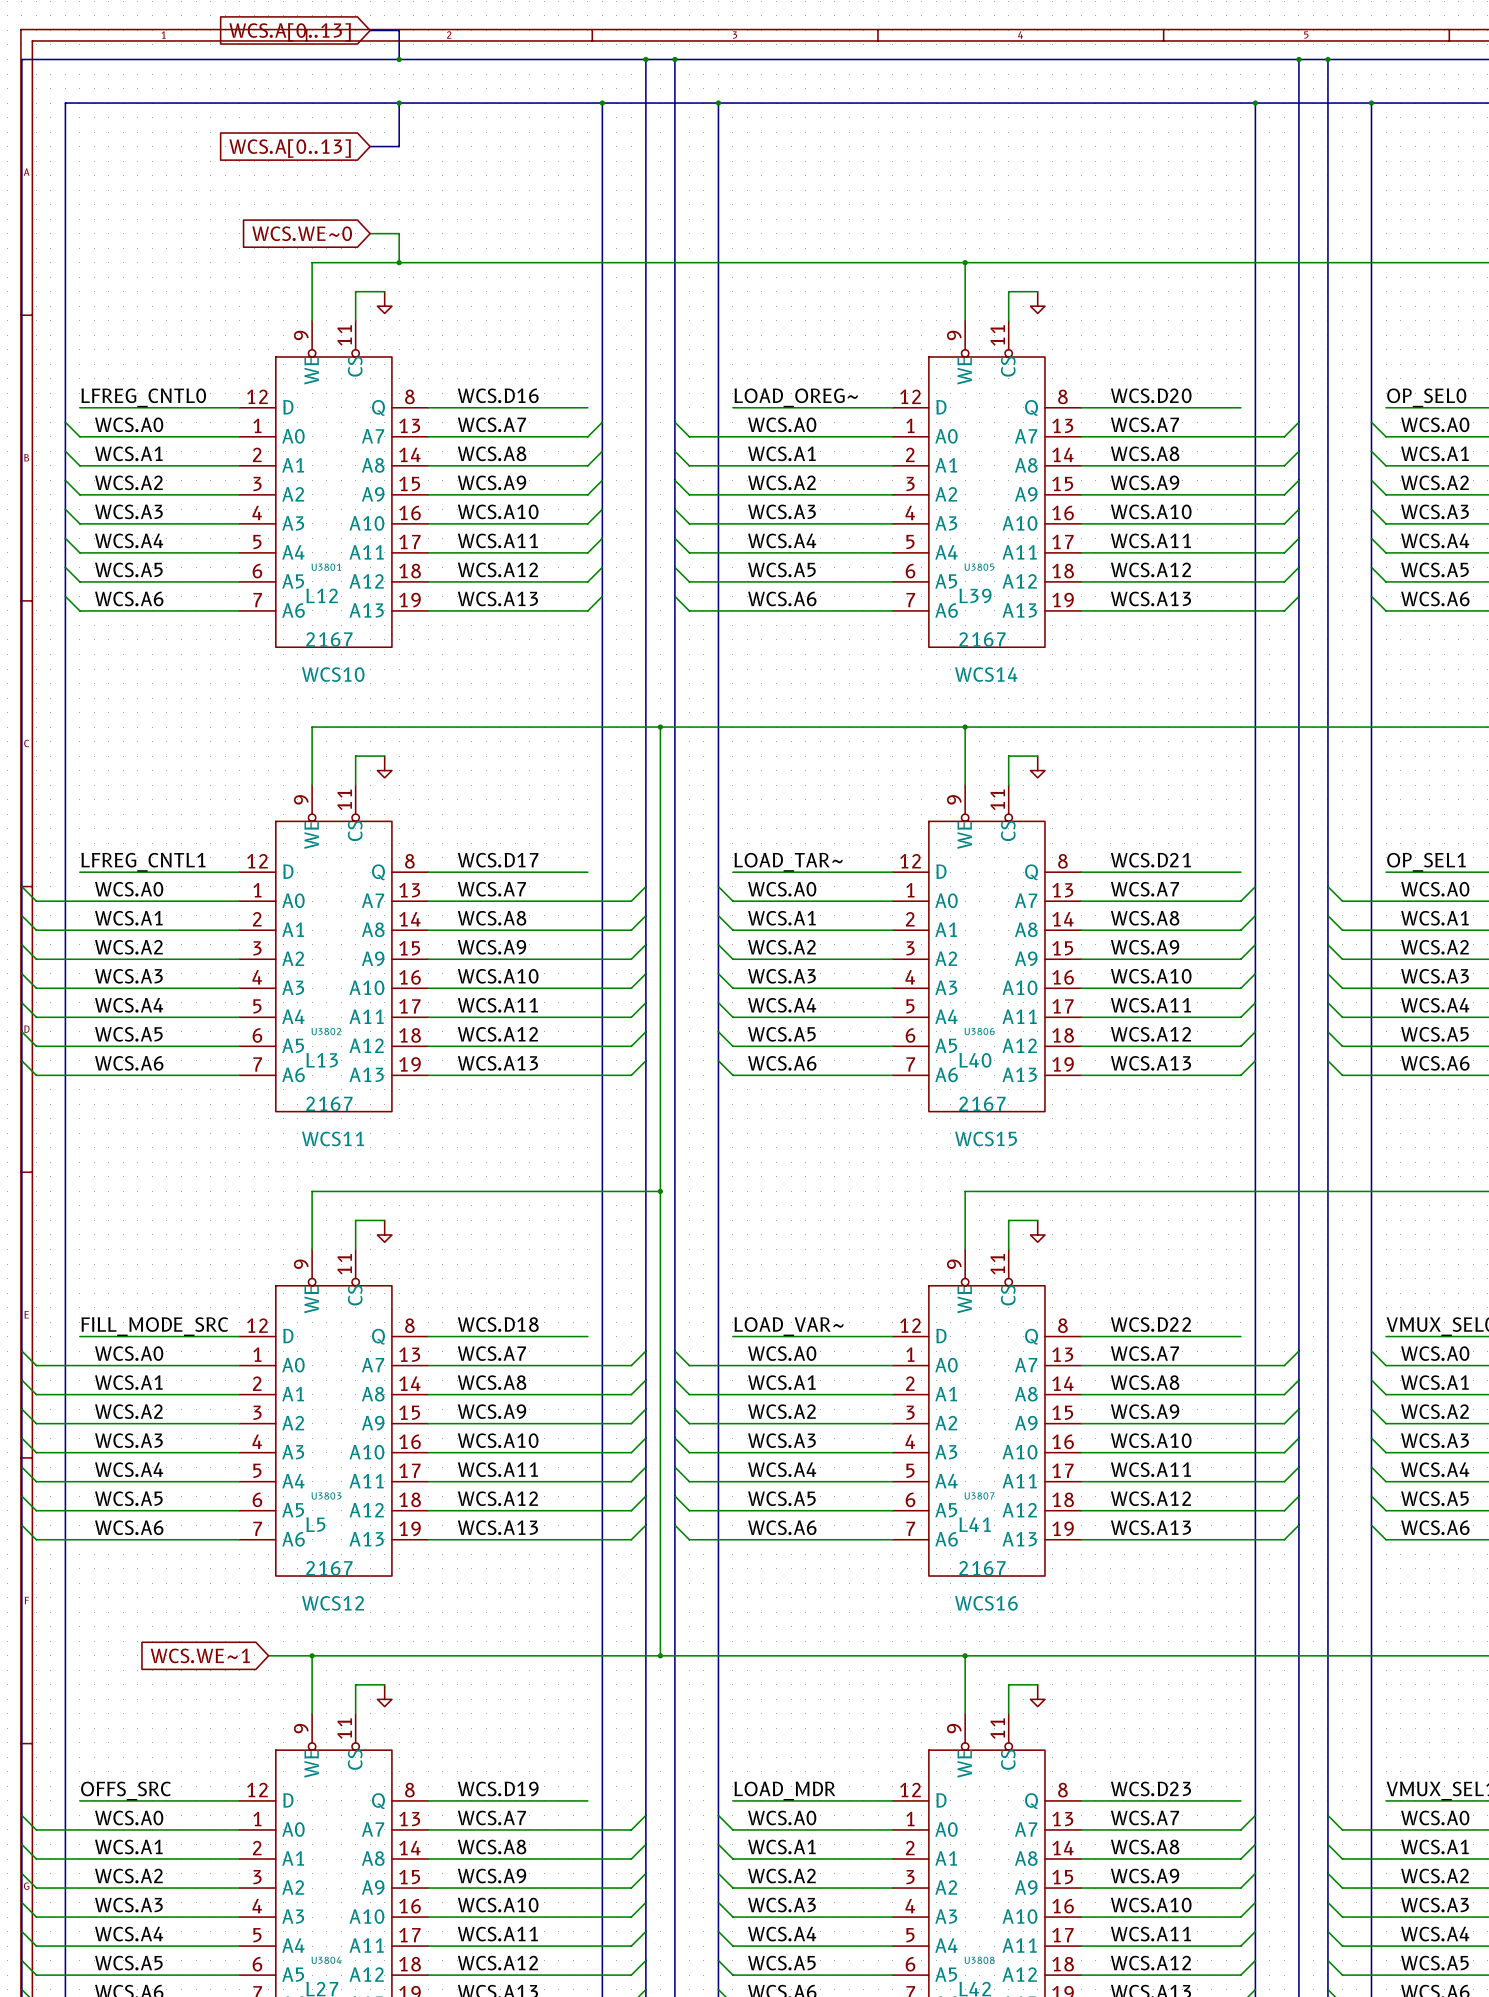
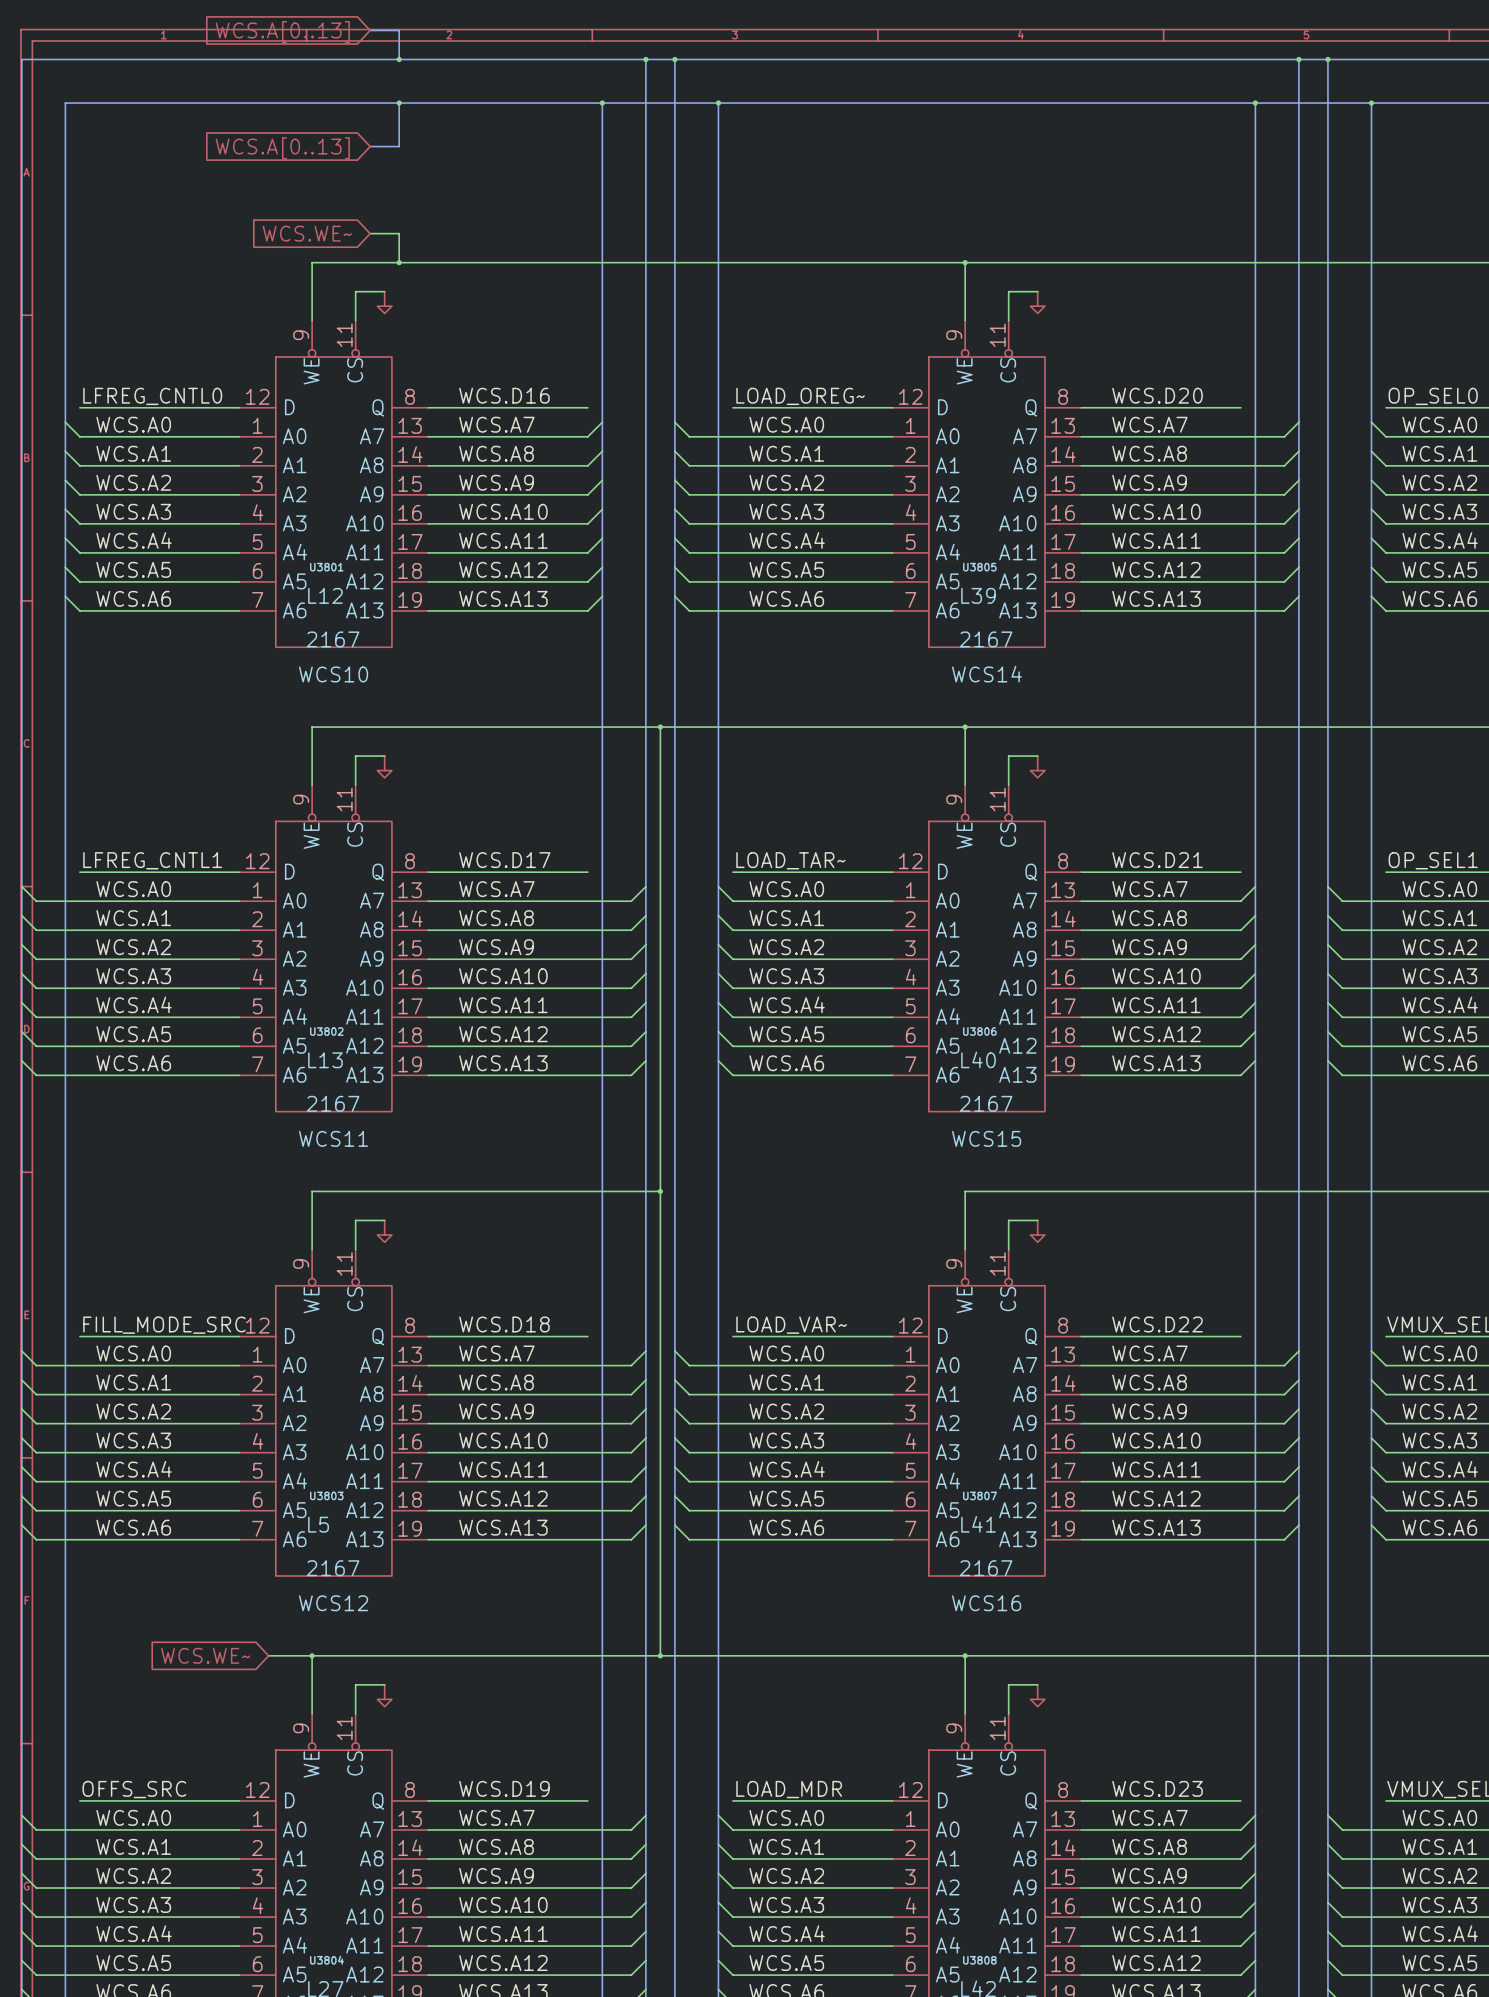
global label: WCS.WE~0 (302, 233) -> WCS.WE~ (307, 233)
global label: WCS.WE~1 (200, 1655) -> WCS.WE~ (205, 1655)

